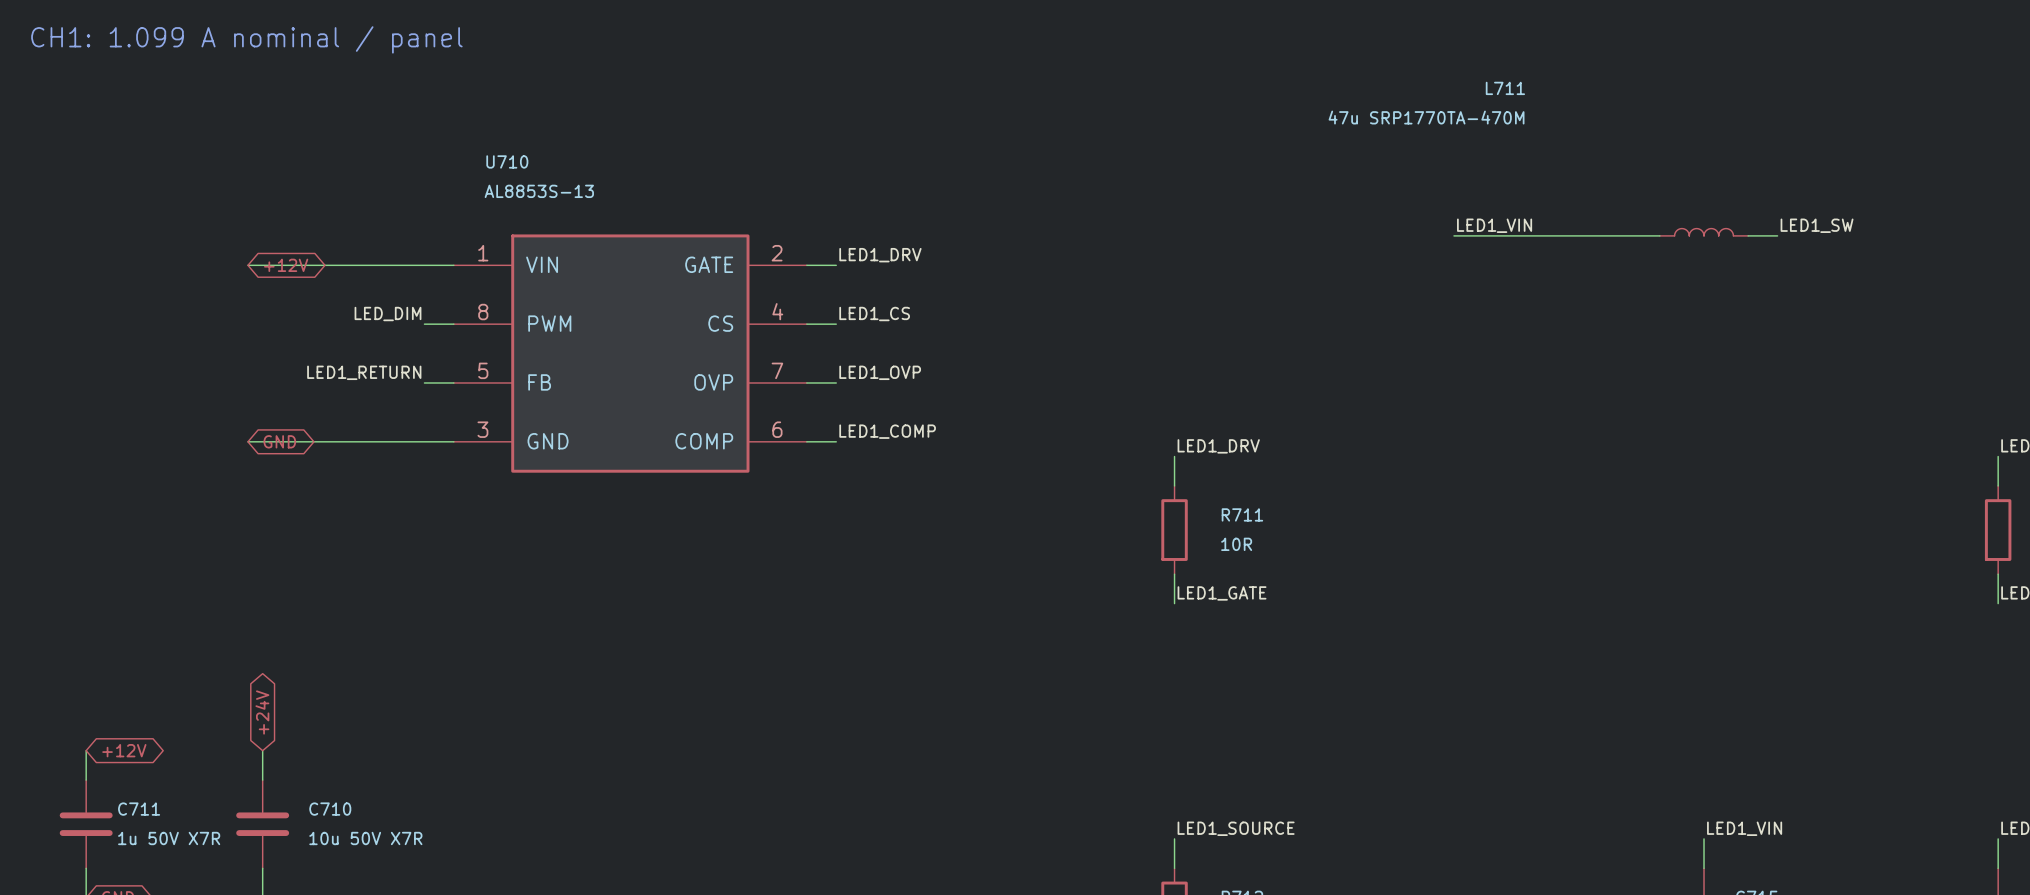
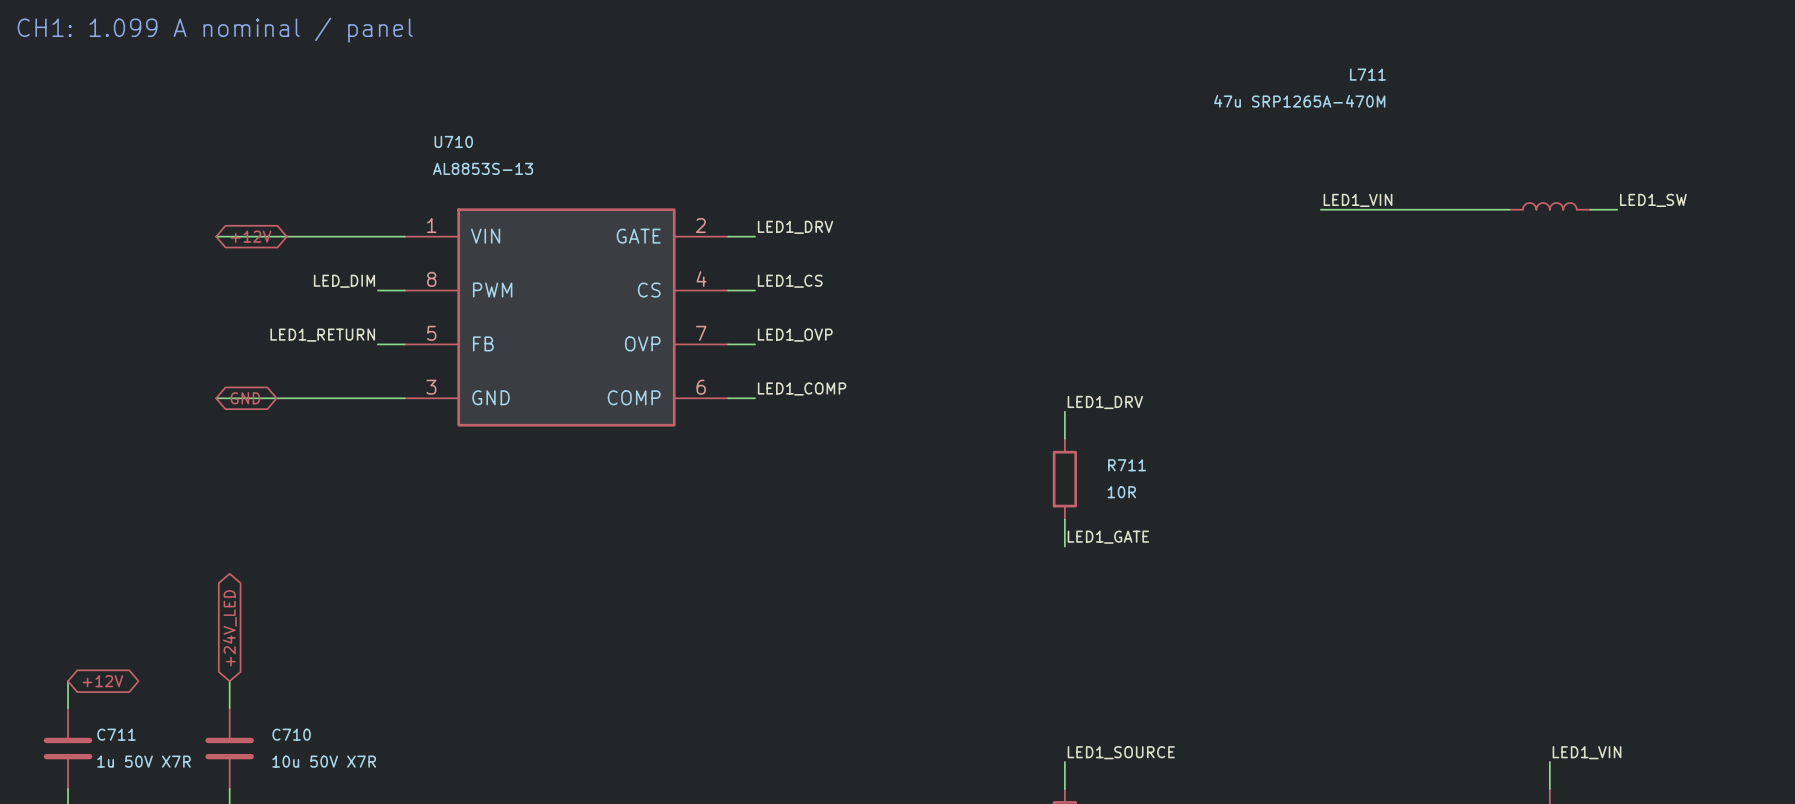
L711 value: 47u SRP1770TA-470M (1426, 117) -> 47u SRP1265A-470M (1299, 101)
global label: +24V (262, 712) -> +24V_LED (229, 628)

